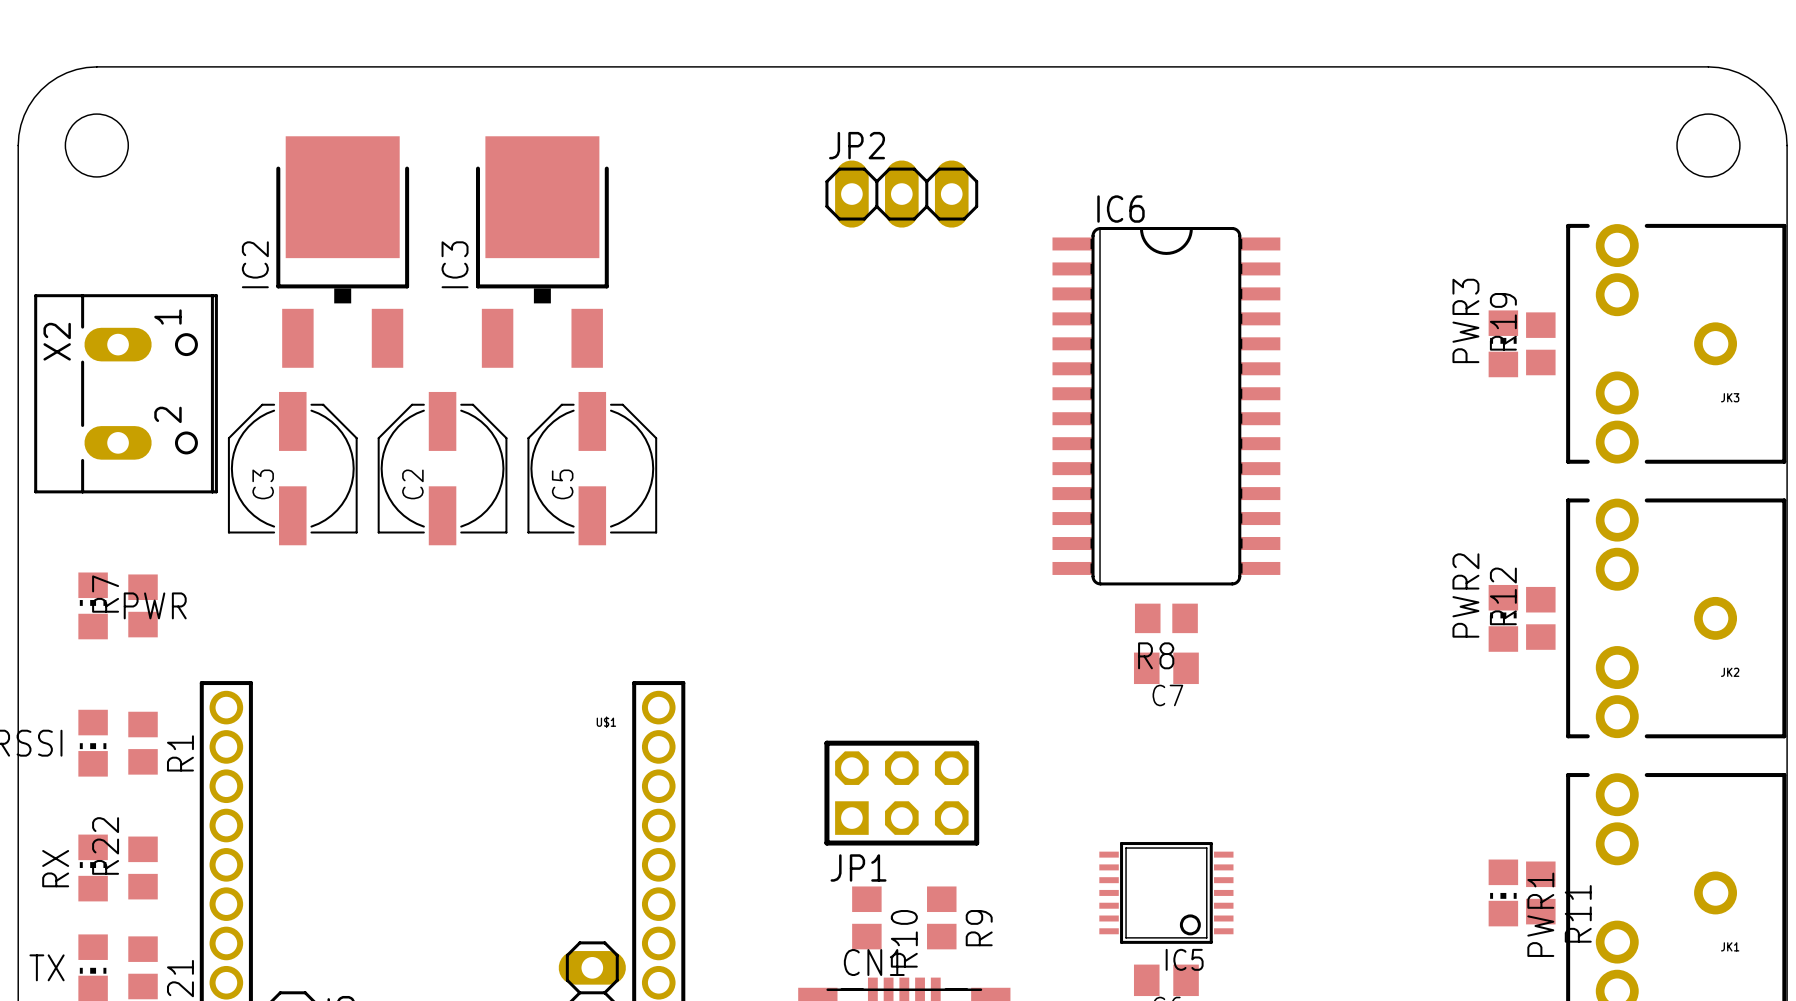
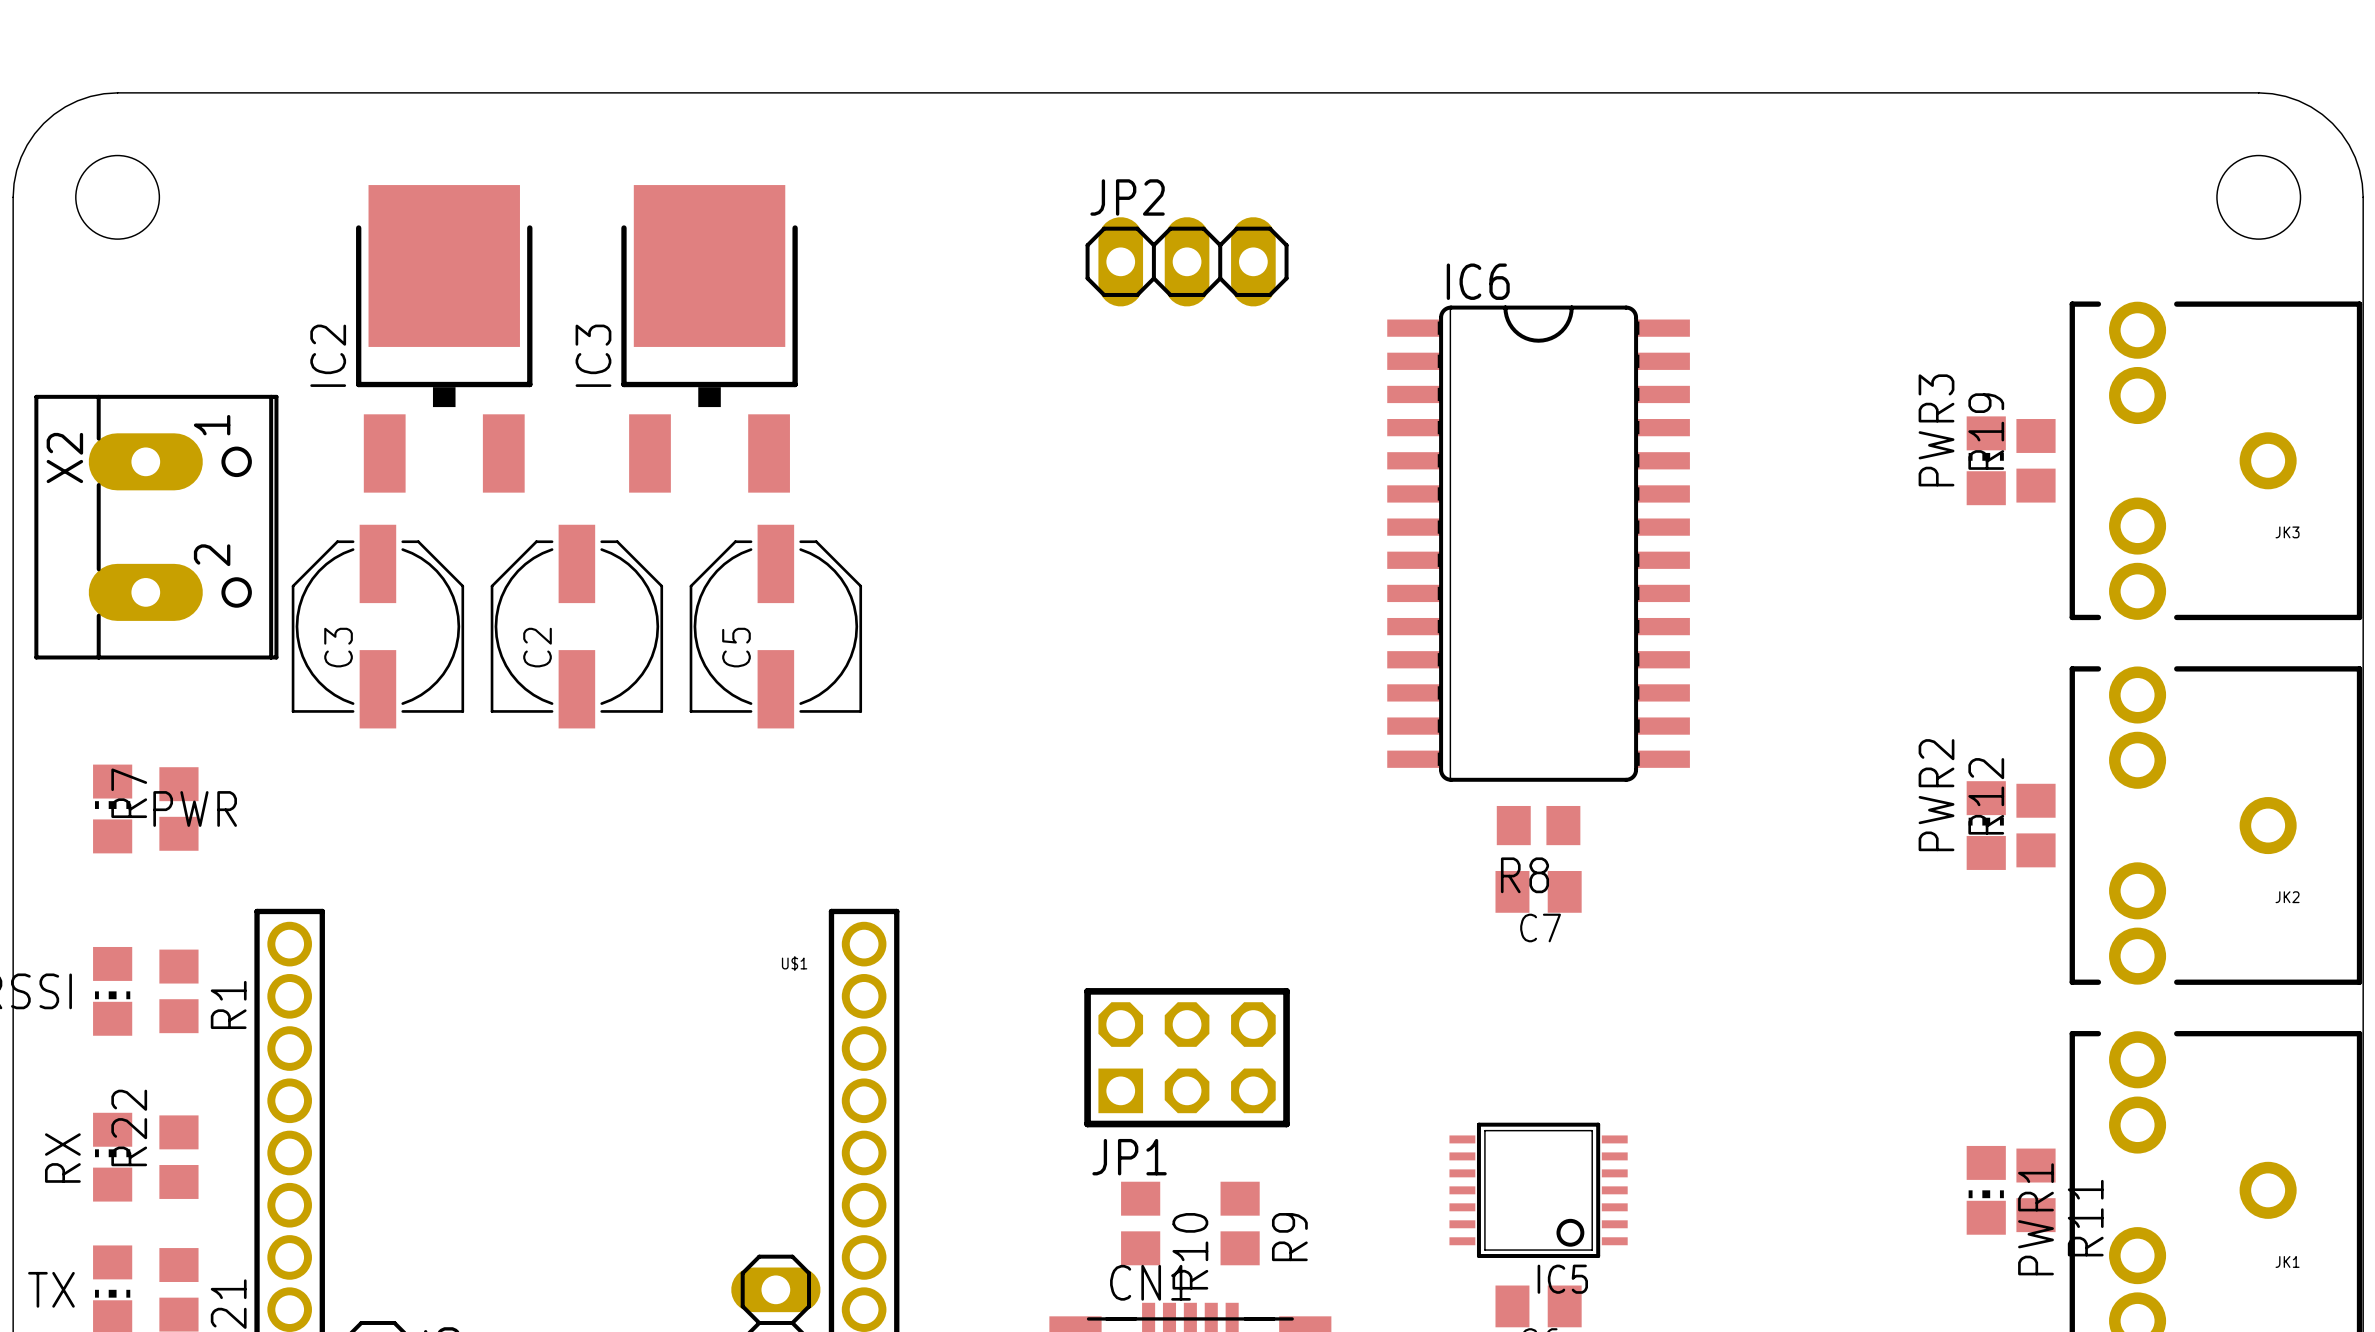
X2 footprint: [34, 294, 218, 494] -> [34, 394, 279, 660]

